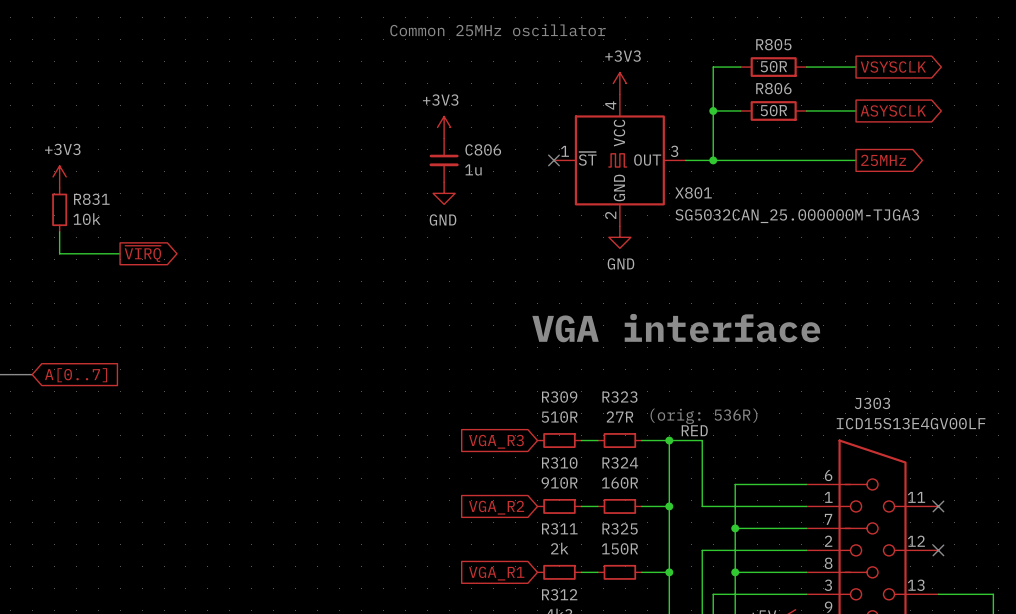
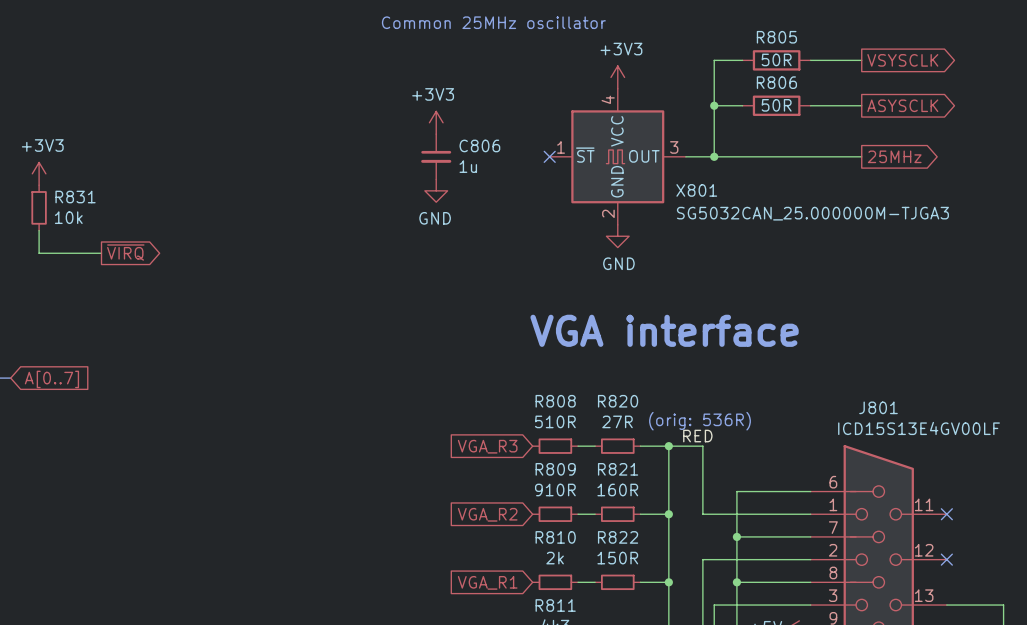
R309 name: R309 (559, 397) -> R808 (555, 401)
R323 name: R323 (619, 397) -> R820 (618, 401)
J303 name: J303 (872, 403) -> J801 (878, 407)
R310 name: R310 (559, 462) -> R809 (555, 469)
R324 name: R324 (620, 462) -> R821 (618, 469)
R311 name: R311 (559, 528) -> R810 (555, 537)
R325 name: R325 (620, 528) -> R822 (618, 537)
R312 name: R312 (559, 594) -> R811 (555, 605)

